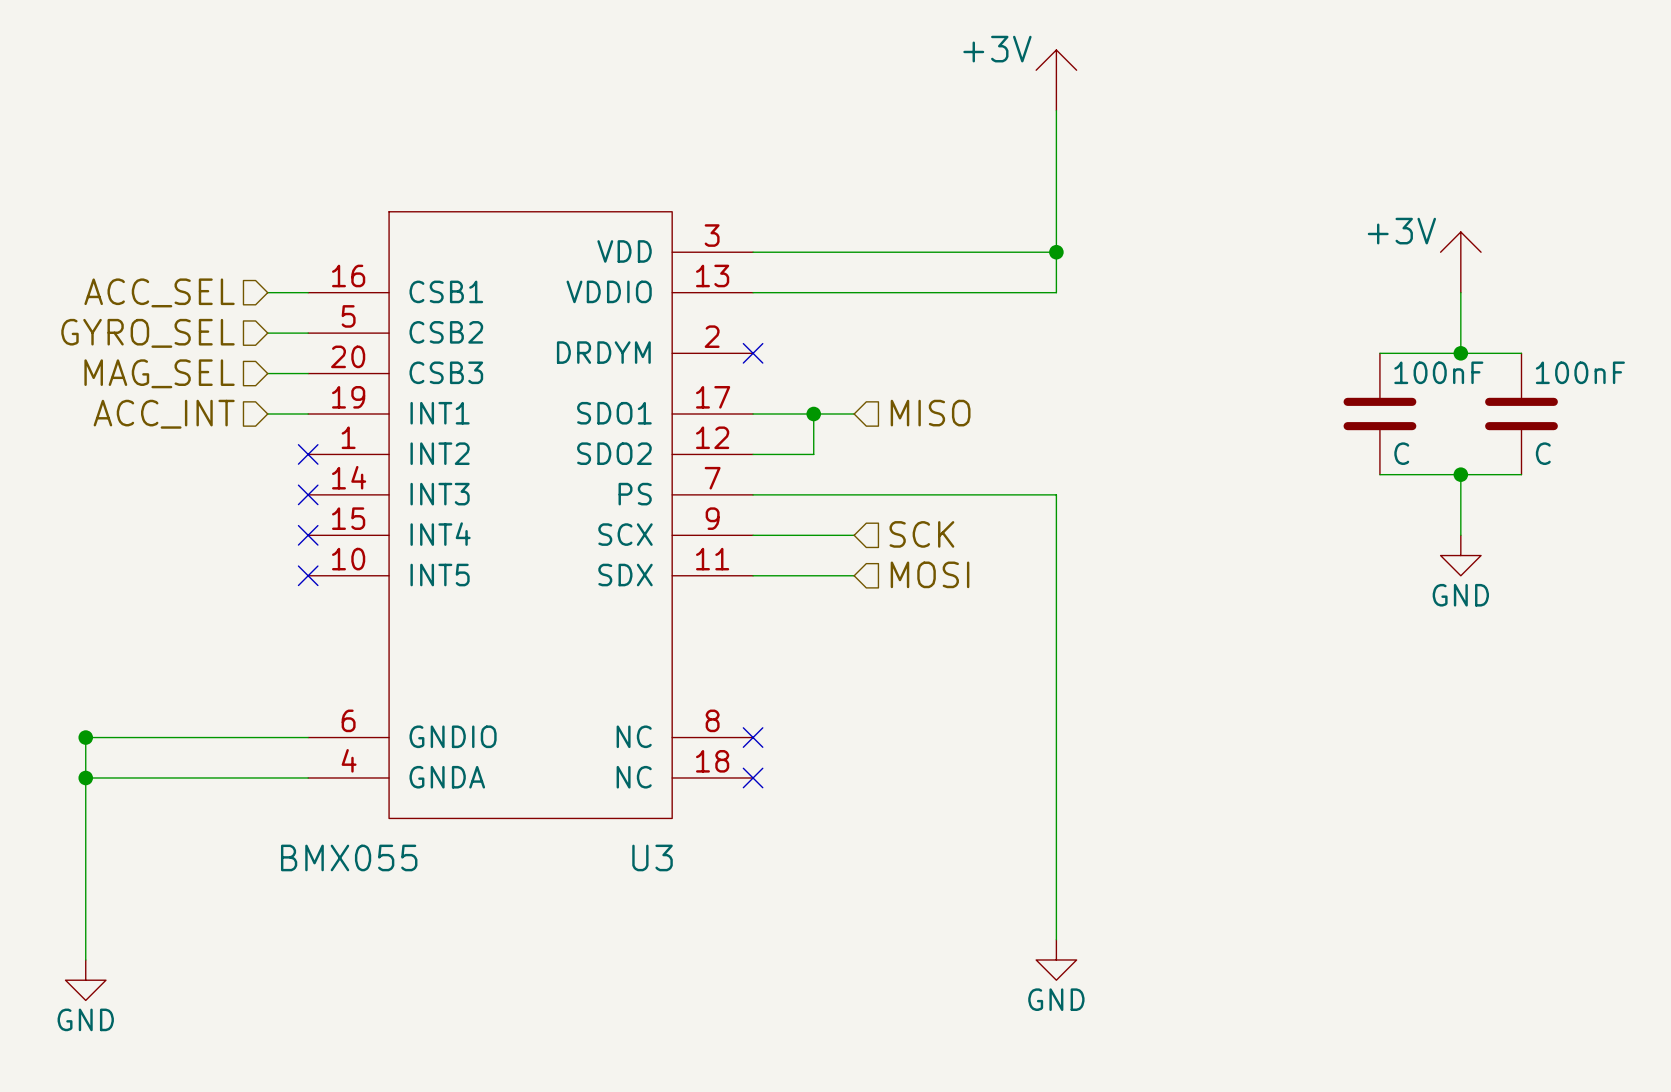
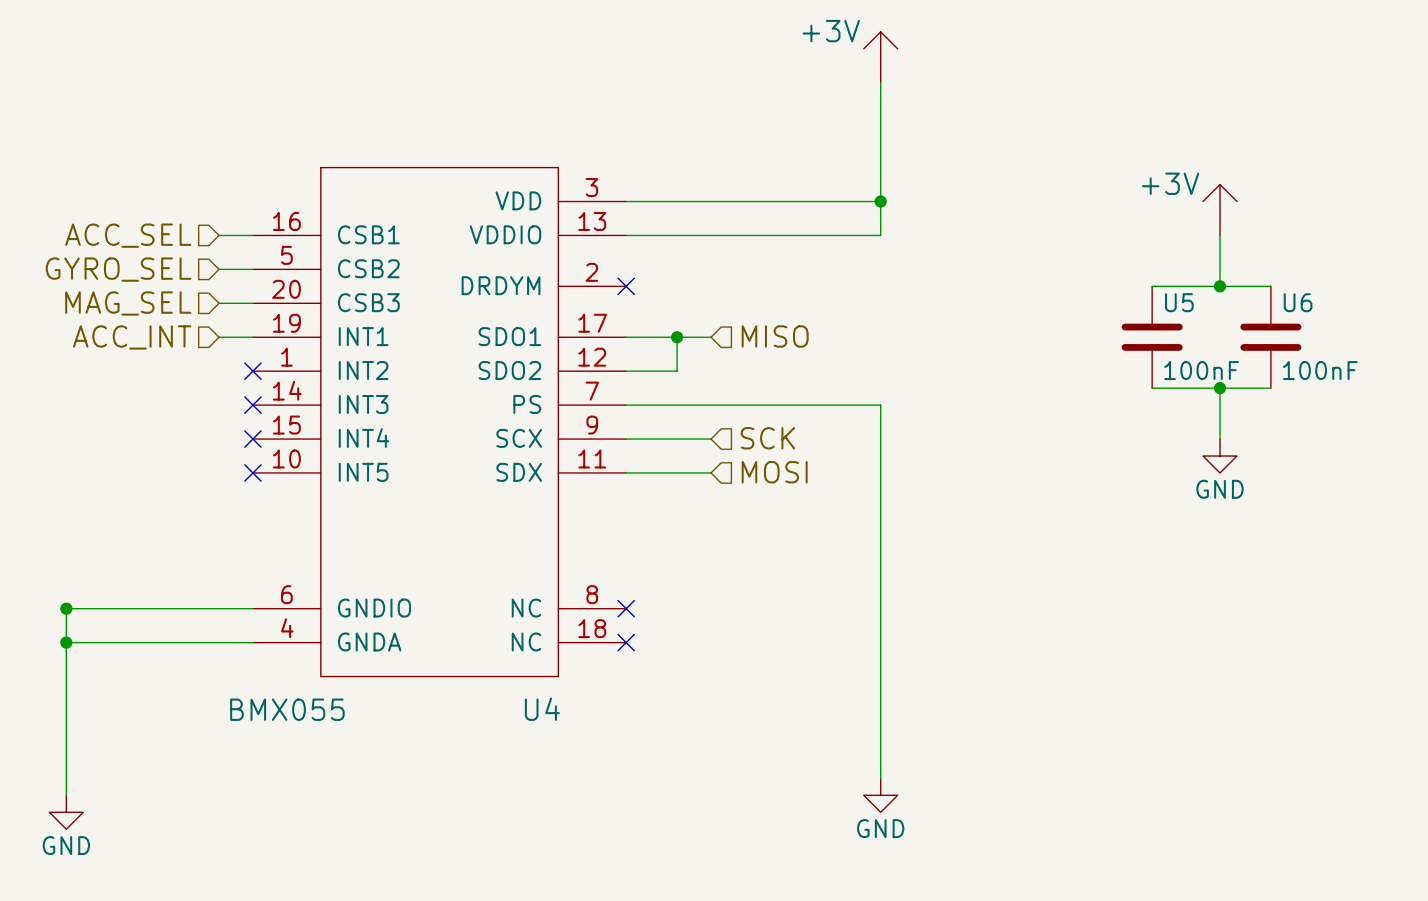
100nF name: 100nF (1438, 372) -> U5 (1179, 302)
100nF name: 100nF (1580, 372) -> U6 (1298, 302)
100nF value: C (1401, 453) -> 100nF (1201, 370)
100nF value: C (1543, 453) -> 100nF (1320, 370)
U3 name: U3 (652, 857) -> U4 (542, 709)

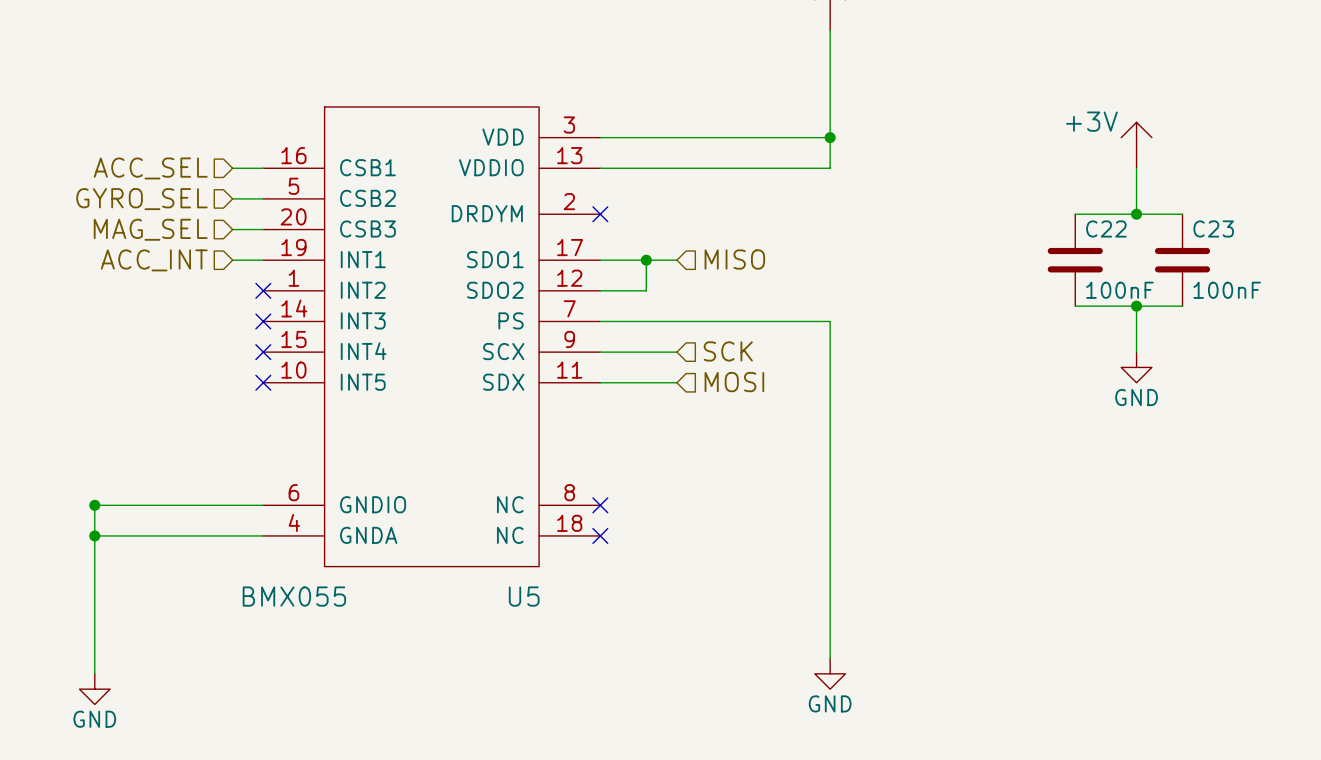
U5 name: U5 (1179, 302) -> C22 (1106, 228)
U6 name: U6 (1298, 302) -> C23 (1213, 228)
U4 name: U4 (542, 709) -> U5 (524, 596)

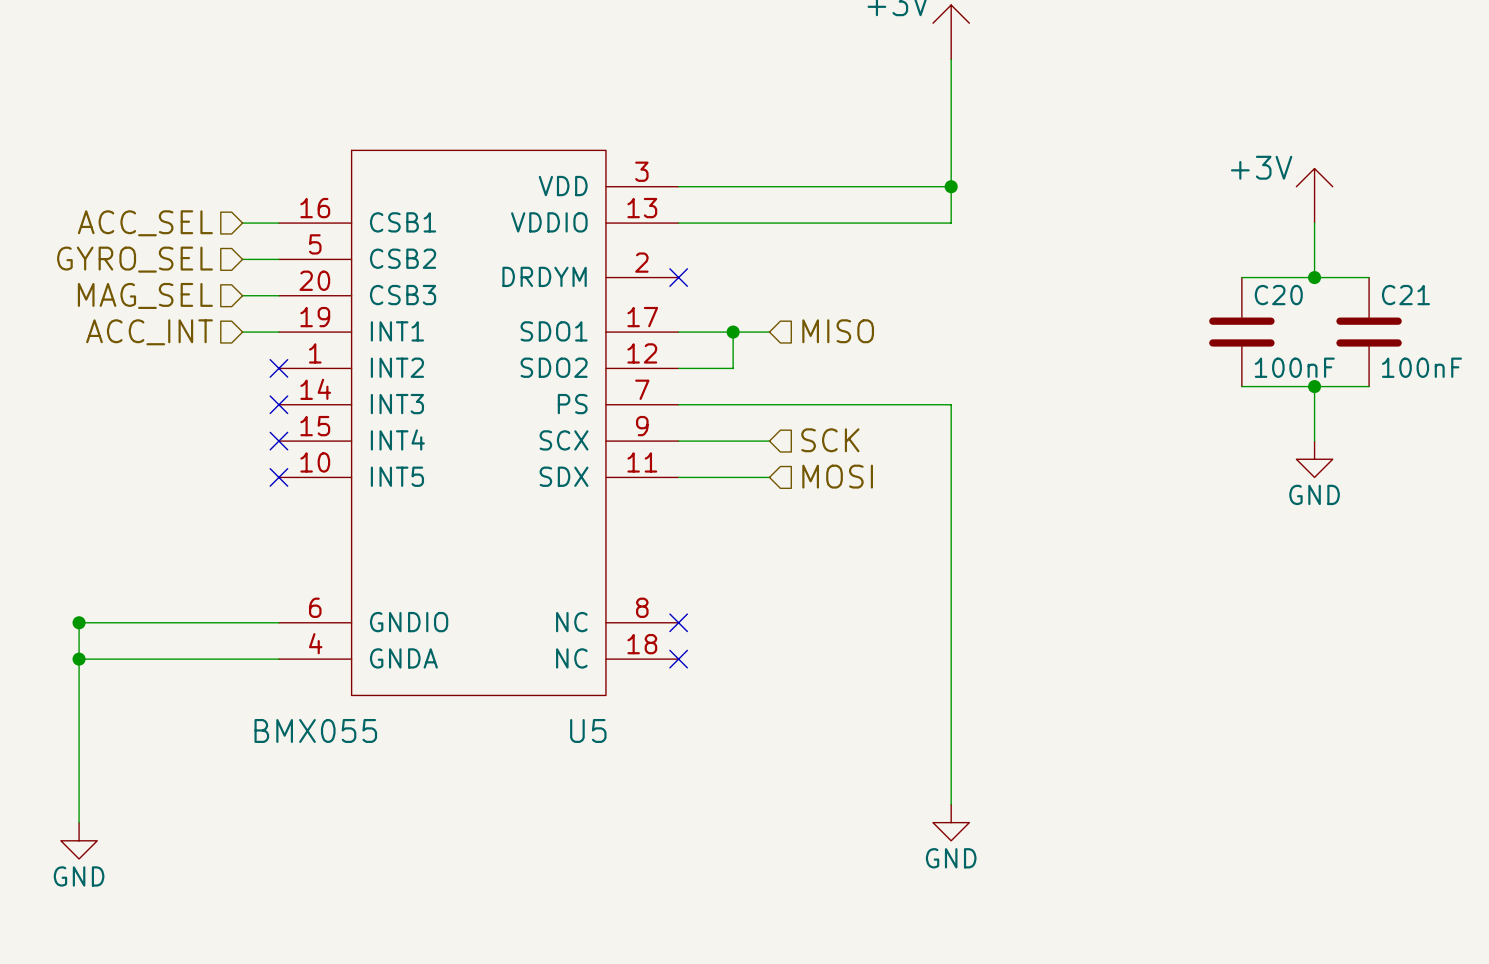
C22 name: C22 (1106, 228) -> C20 (1278, 295)
C23 name: C23 (1213, 228) -> C21 (1405, 295)

